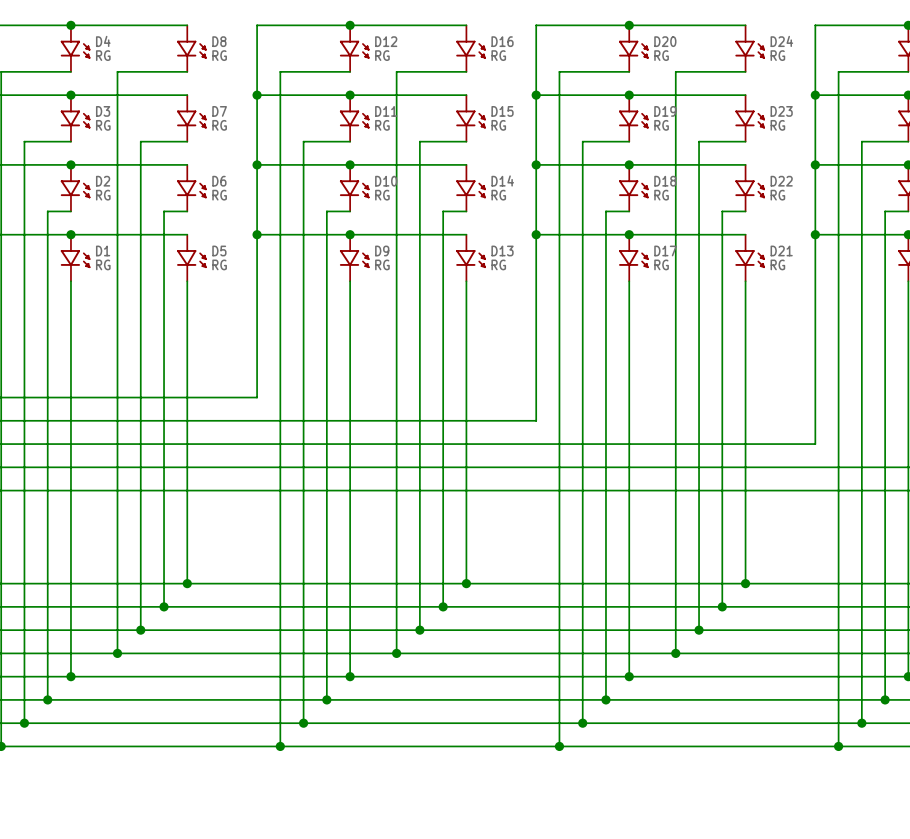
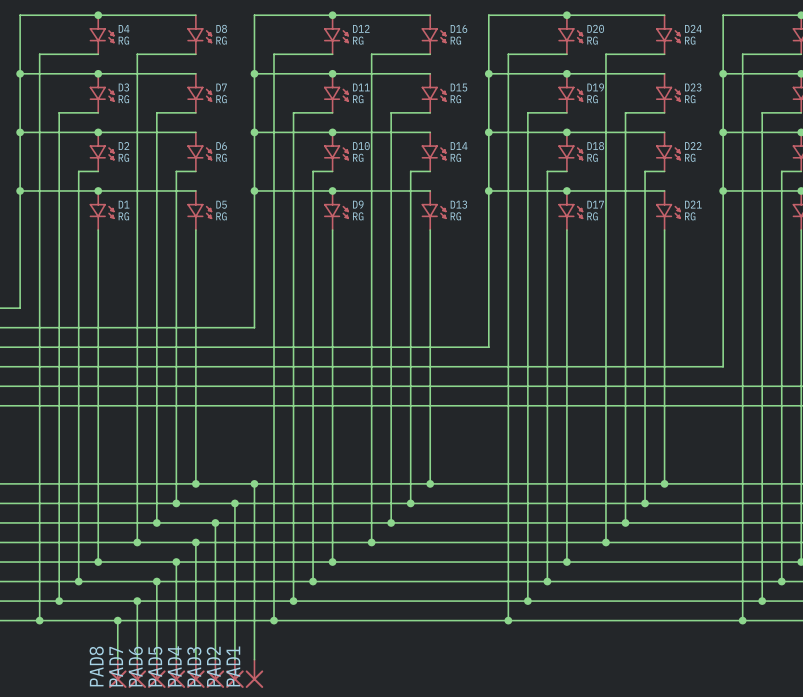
wire: none -> (254, 483) (254, 659)
junction: none -> (254, 483)
wire: none -> (234, 503) (234, 659)
junction: none -> (234, 503)
wire: none -> (215, 522) (215, 659)
junction: none -> (215, 522)
wire: none -> (195, 542) (195, 659)
junction: none -> (195, 542)
wire: none -> (176, 562) (176, 659)
junction: none -> (176, 562)
wire: none -> (156, 581) (156, 659)
junction: none -> (156, 581)
wire: none -> (137, 601) (137, 659)
junction: none -> (137, 601)
wire: none -> (117, 620) (117, 659)
junction: none -> (117, 620)
PAD8: none -> (117, 673)
PAD7: none -> (137, 673)
PAD6: none -> (156, 673)
PAD5: none -> (176, 673)
PAD4: none -> (195, 673)
PAD3: none -> (215, 673)
PAD2: none -> (234, 673)
PAD1: none -> (254, 673)

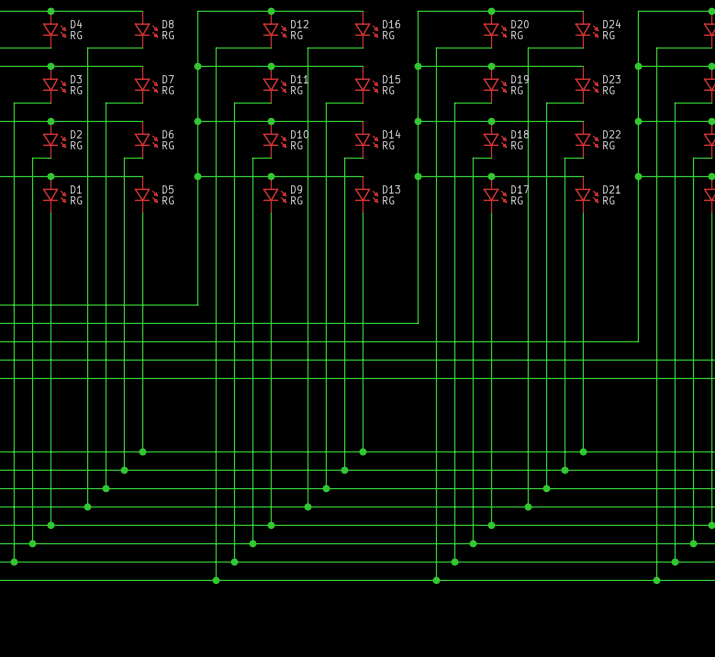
wire: (254, 483) (254, 659) -> none
junction: (254, 483) -> none
wire: (234, 503) (234, 659) -> none
junction: (234, 503) -> none
wire: (215, 522) (215, 659) -> none
junction: (215, 522) -> none
wire: (195, 542) (195, 659) -> none
junction: (195, 542) -> none
wire: (176, 562) (176, 659) -> none
junction: (176, 562) -> none
wire: (156, 581) (156, 659) -> none
junction: (156, 581) -> none
wire: (137, 601) (137, 659) -> none
junction: (137, 601) -> none
wire: (117, 620) (117, 659) -> none
junction: (117, 620) -> none
PAD8: (117, 673) -> none
PAD7: (137, 673) -> none
PAD6: (156, 673) -> none
PAD5: (176, 673) -> none
PAD4: (195, 673) -> none
PAD3: (215, 673) -> none
PAD2: (234, 673) -> none
PAD1: (254, 673) -> none

